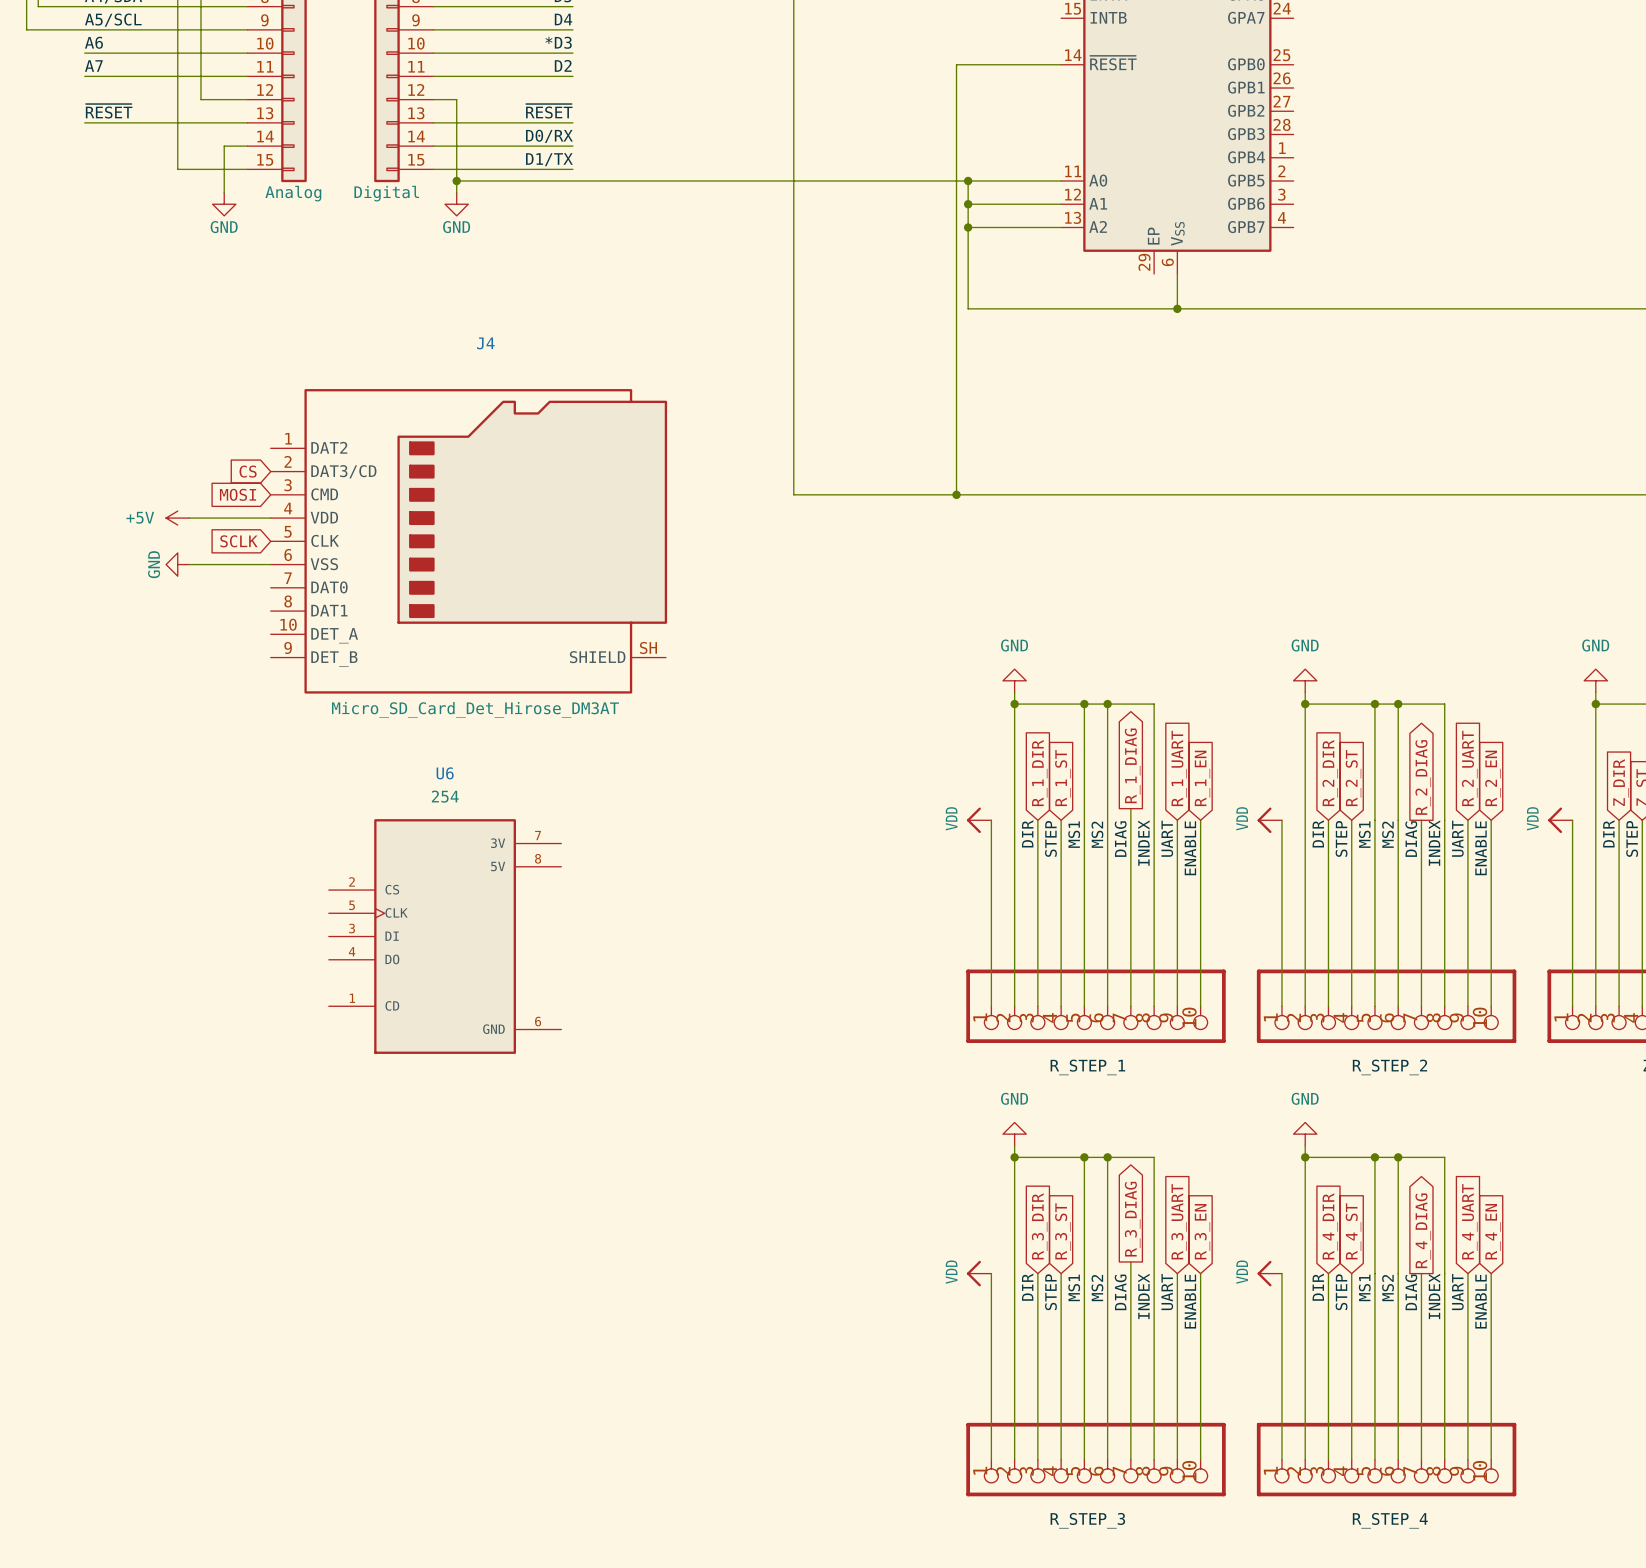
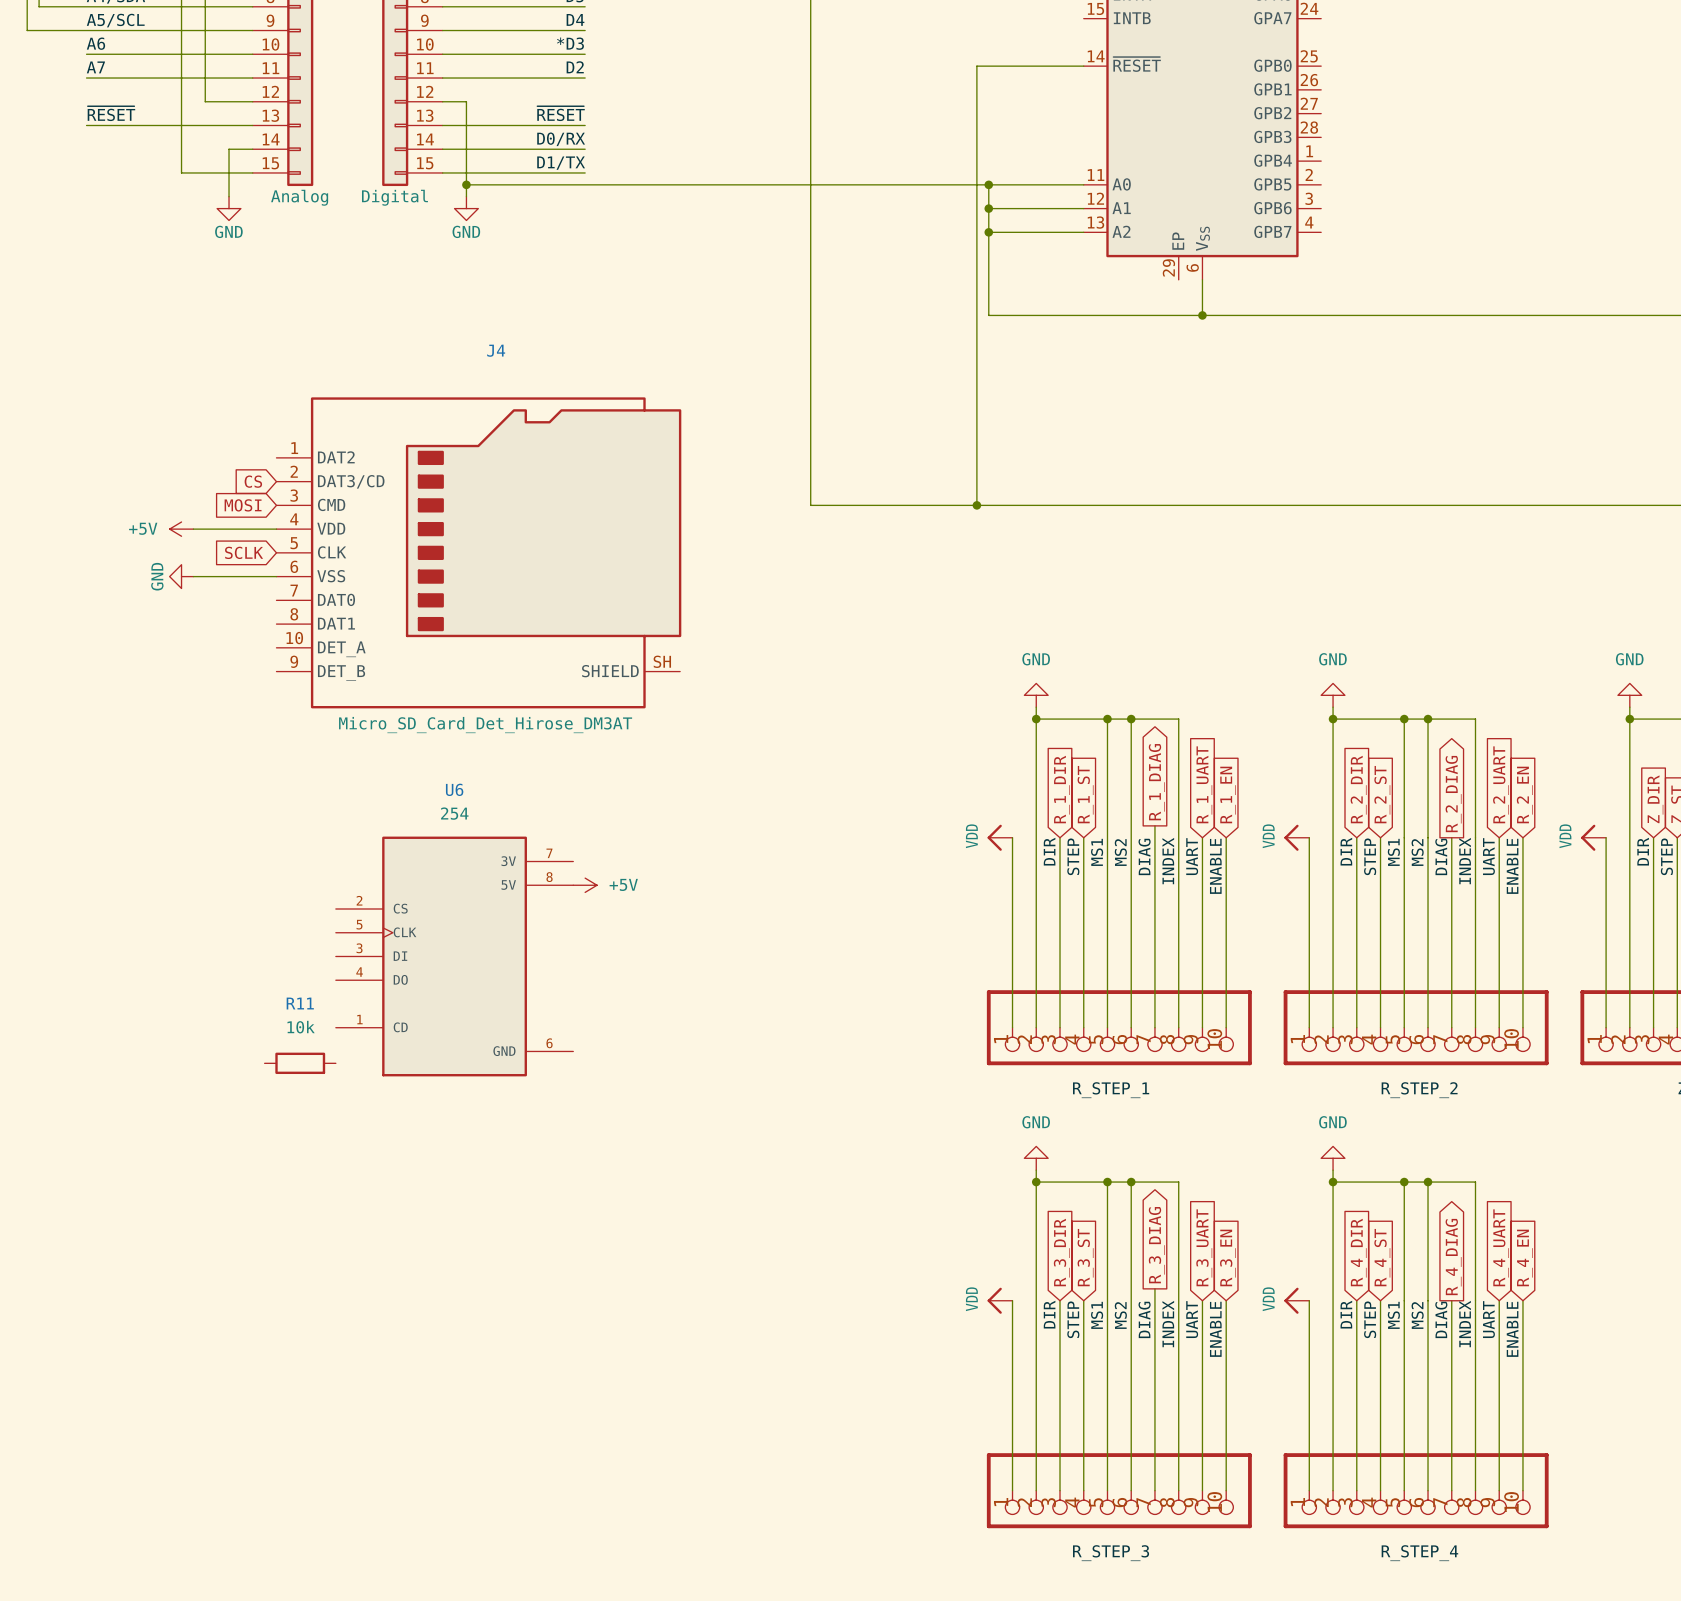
power symbol: none -> +5V (585, 885)
R11: none -> 10k (300, 1063)

